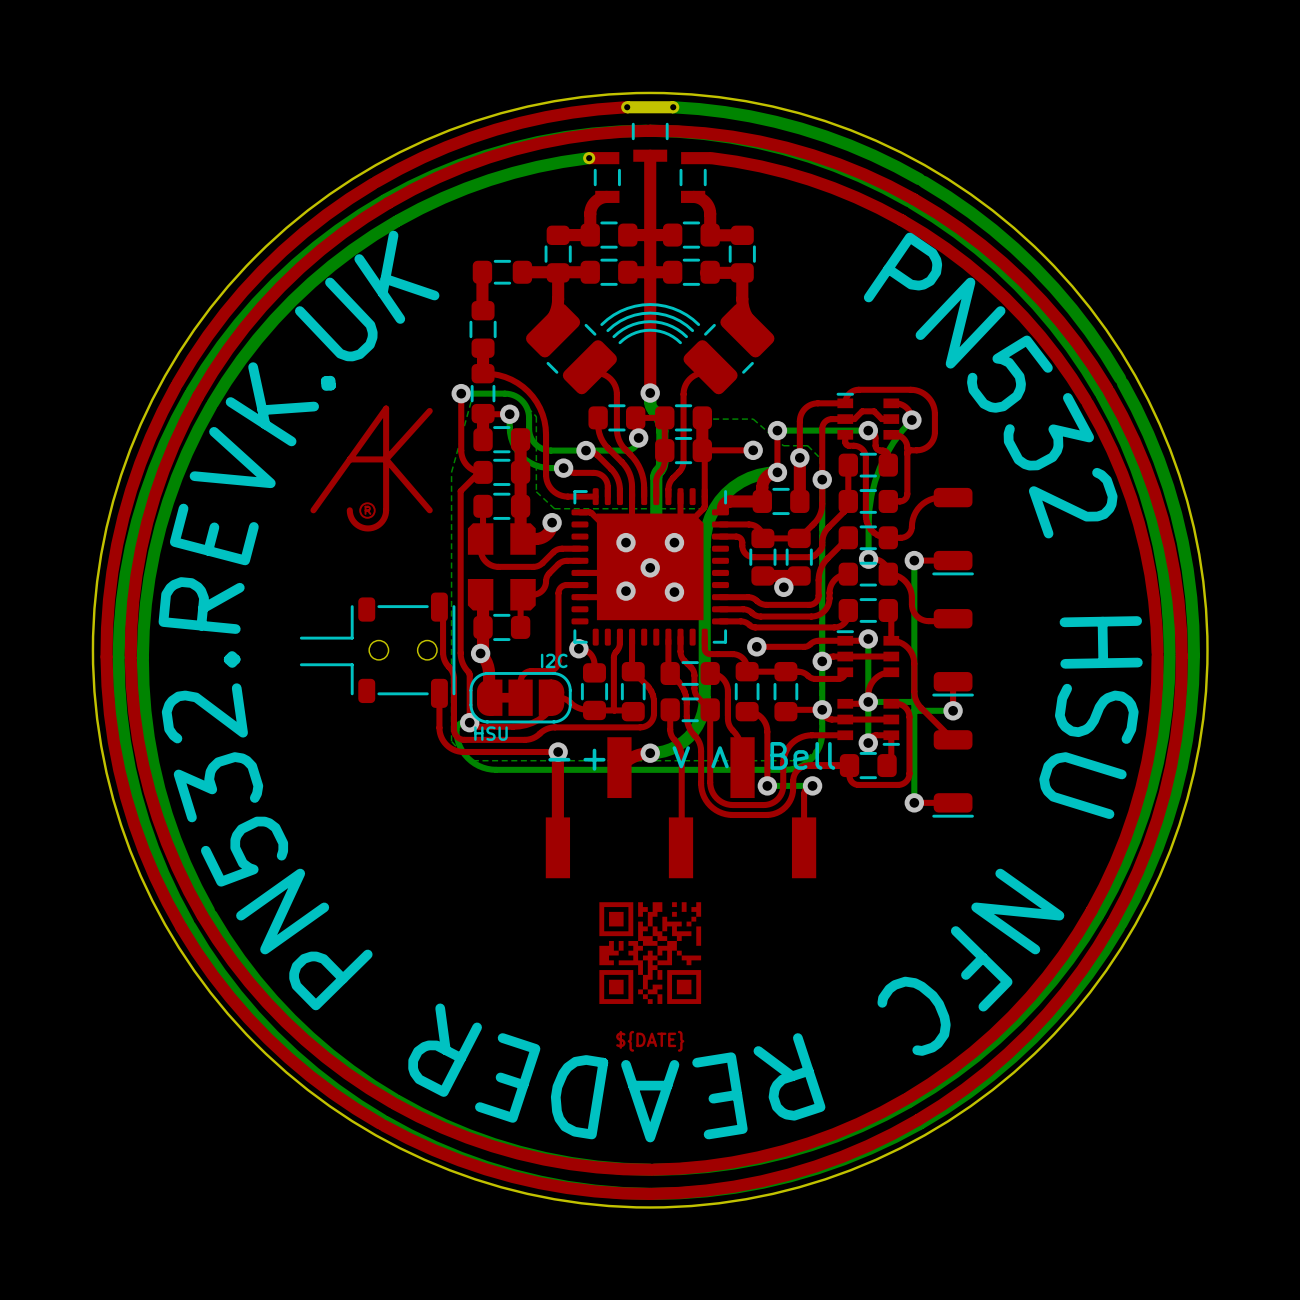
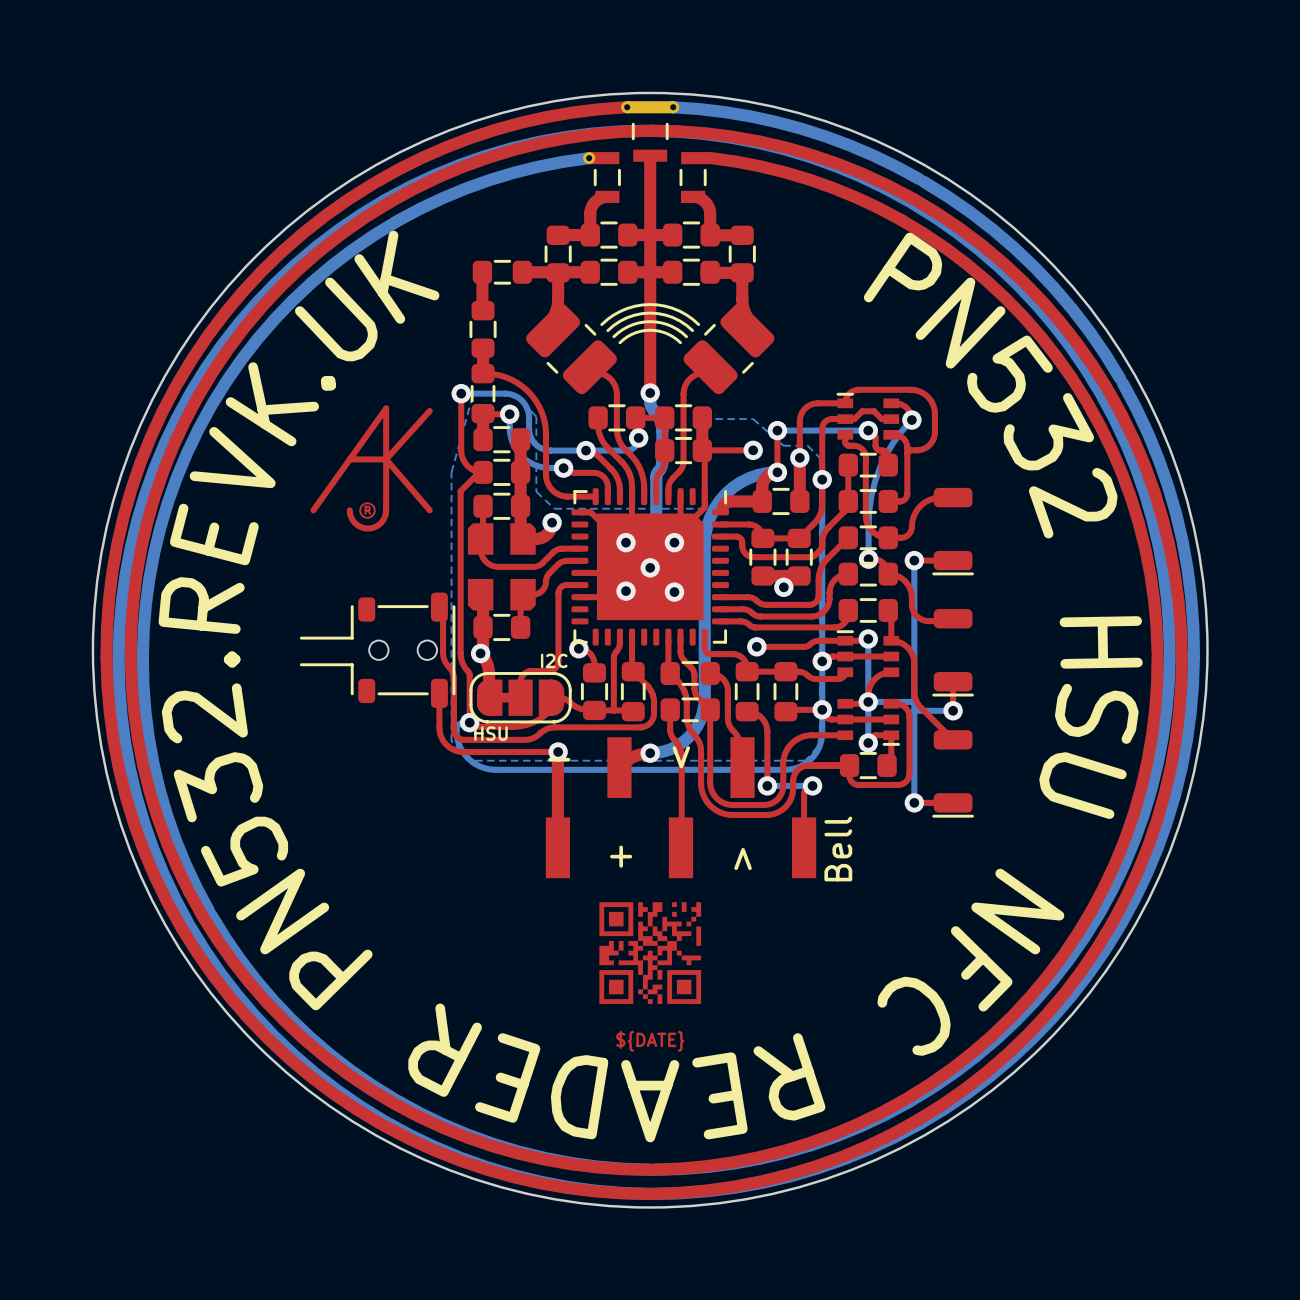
text rotation: 0° (802, 755) -> 90° counterclockwise (838, 848)
text position: Bell (802, 755) -> Bell (838, 848)
text position: > (720, 757) -> > (743, 859)
text position: + (594, 759) -> + (621, 856)

